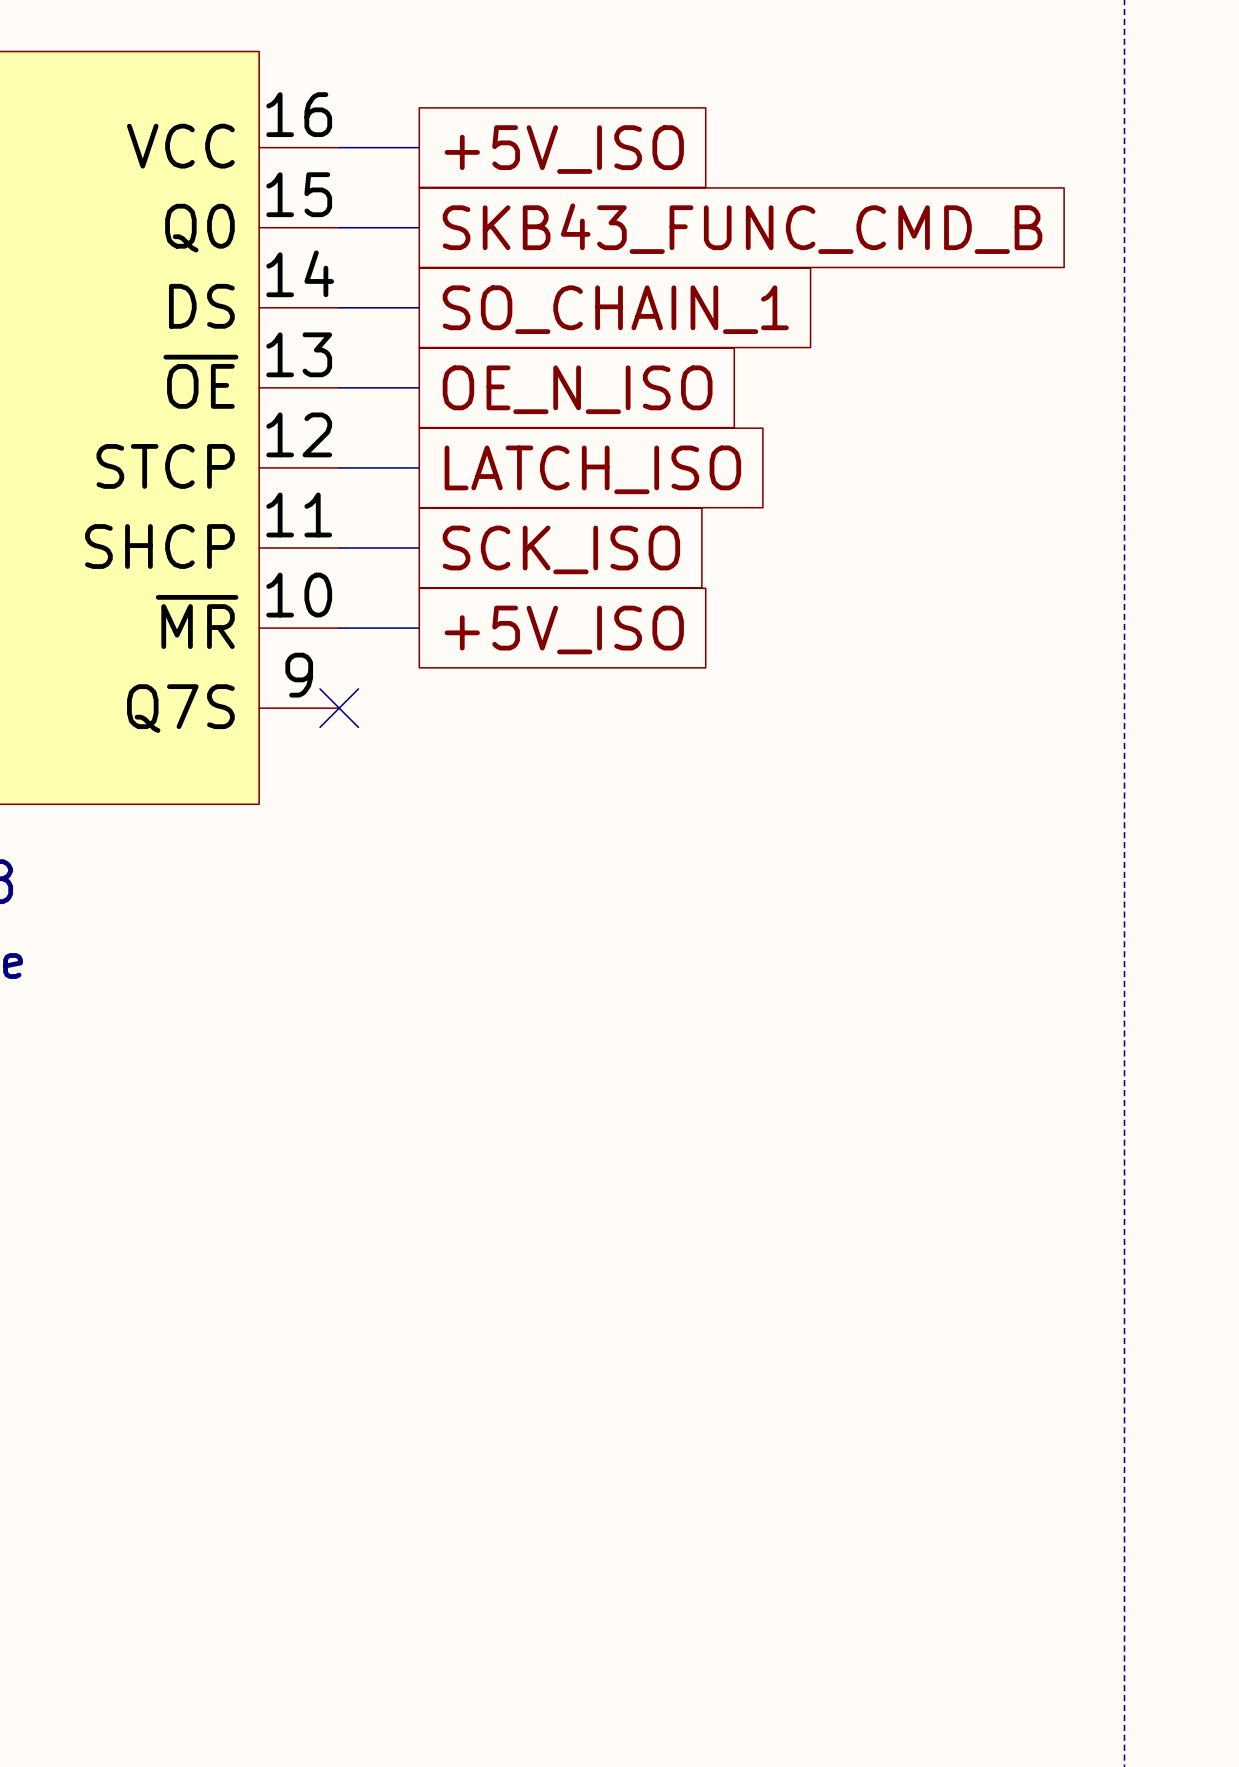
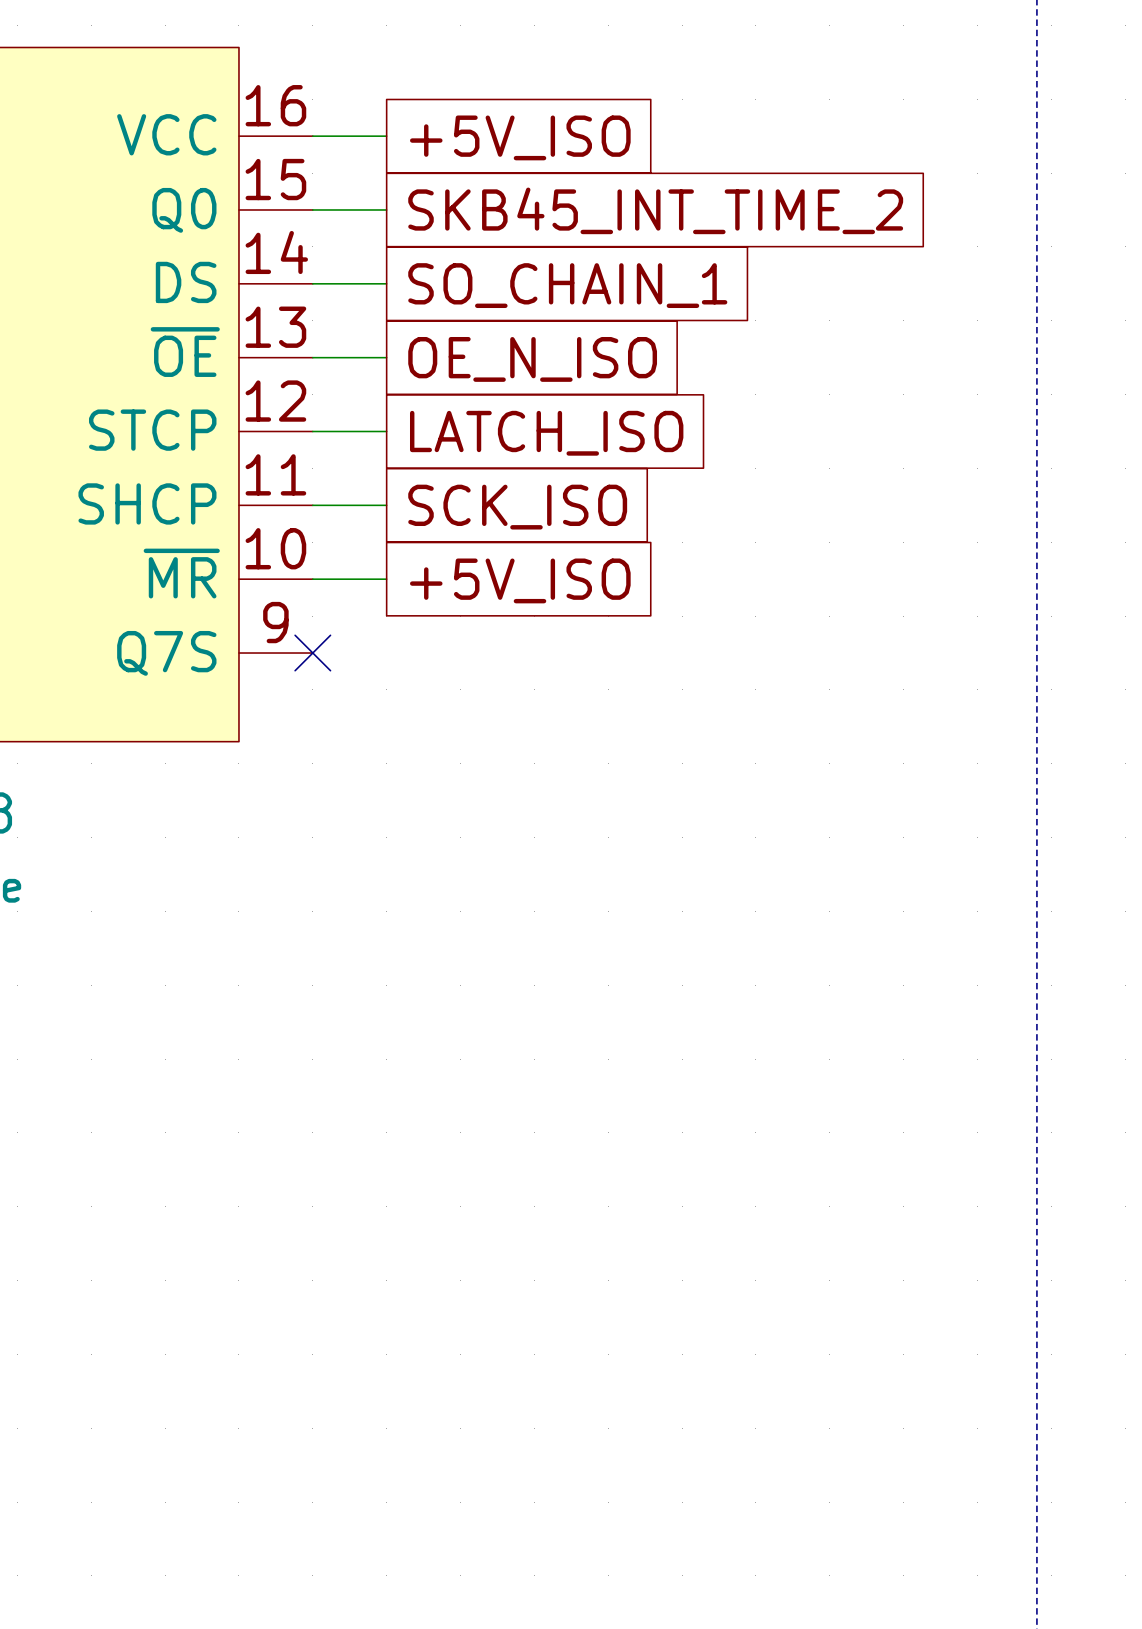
global label: SKB43_FUNC_CMD_B (742, 228) -> SKB45_INT_TIME_2 (655, 210)

